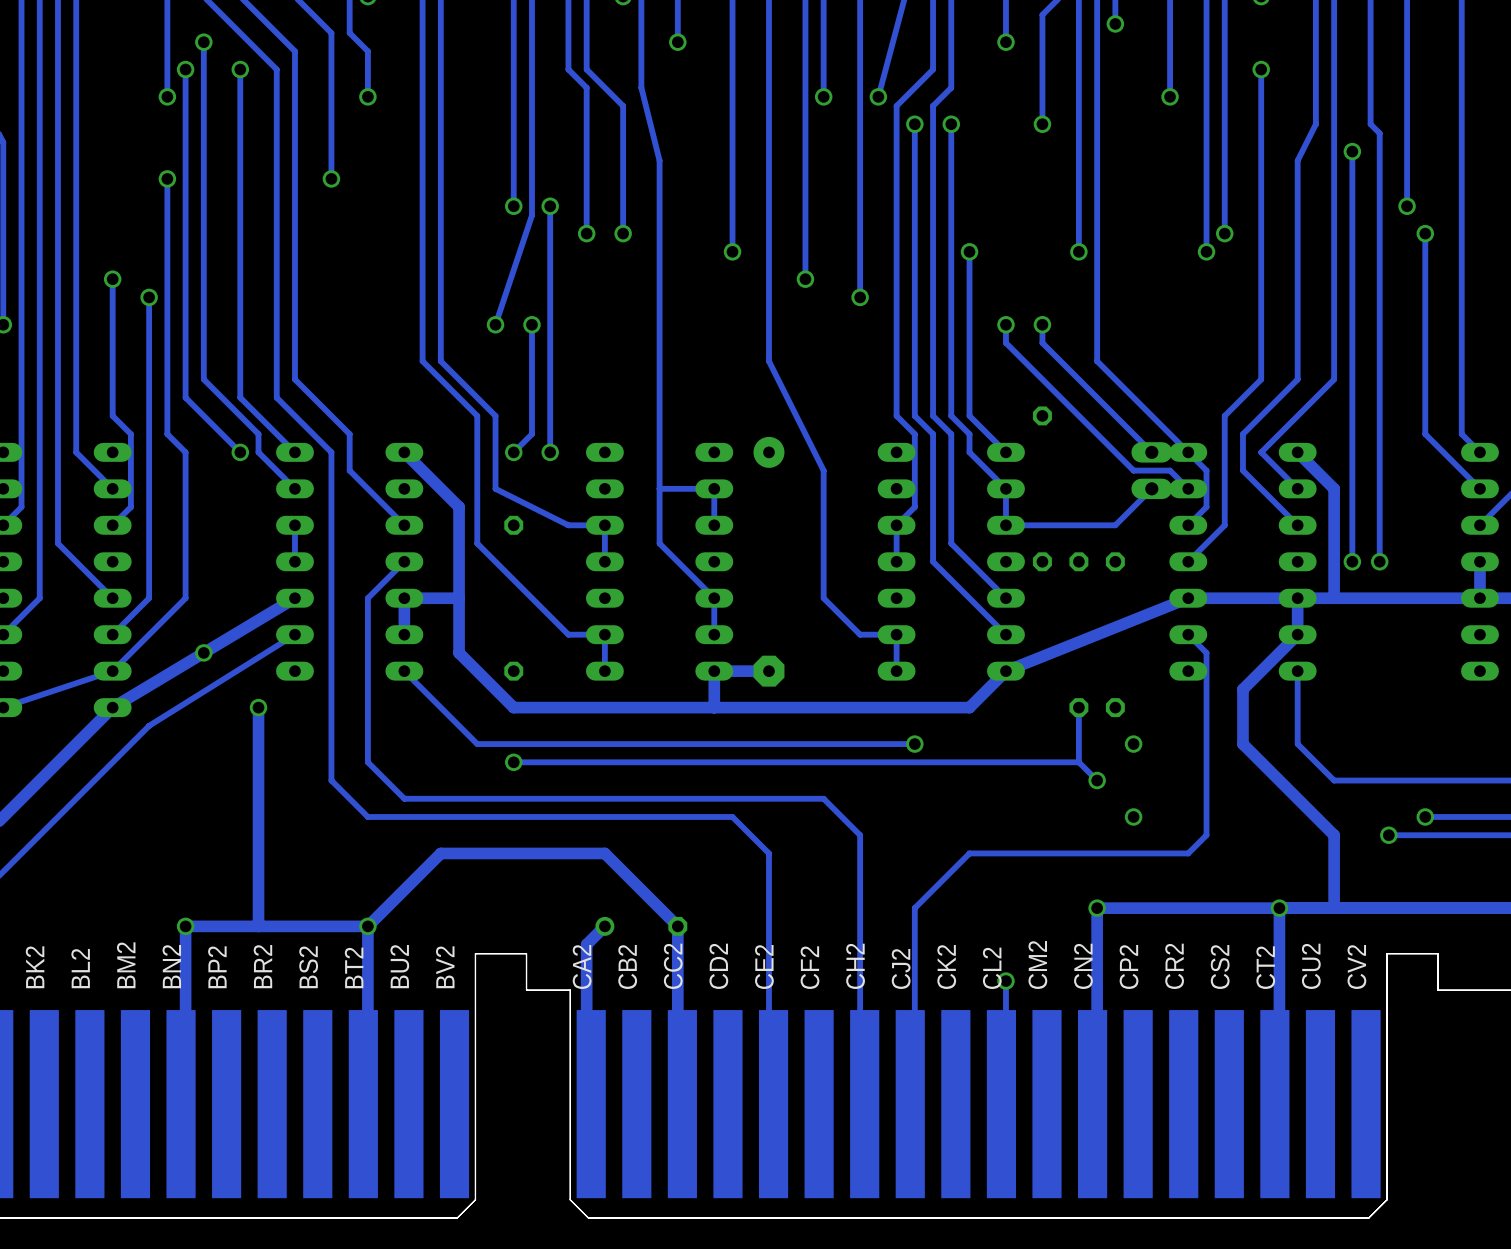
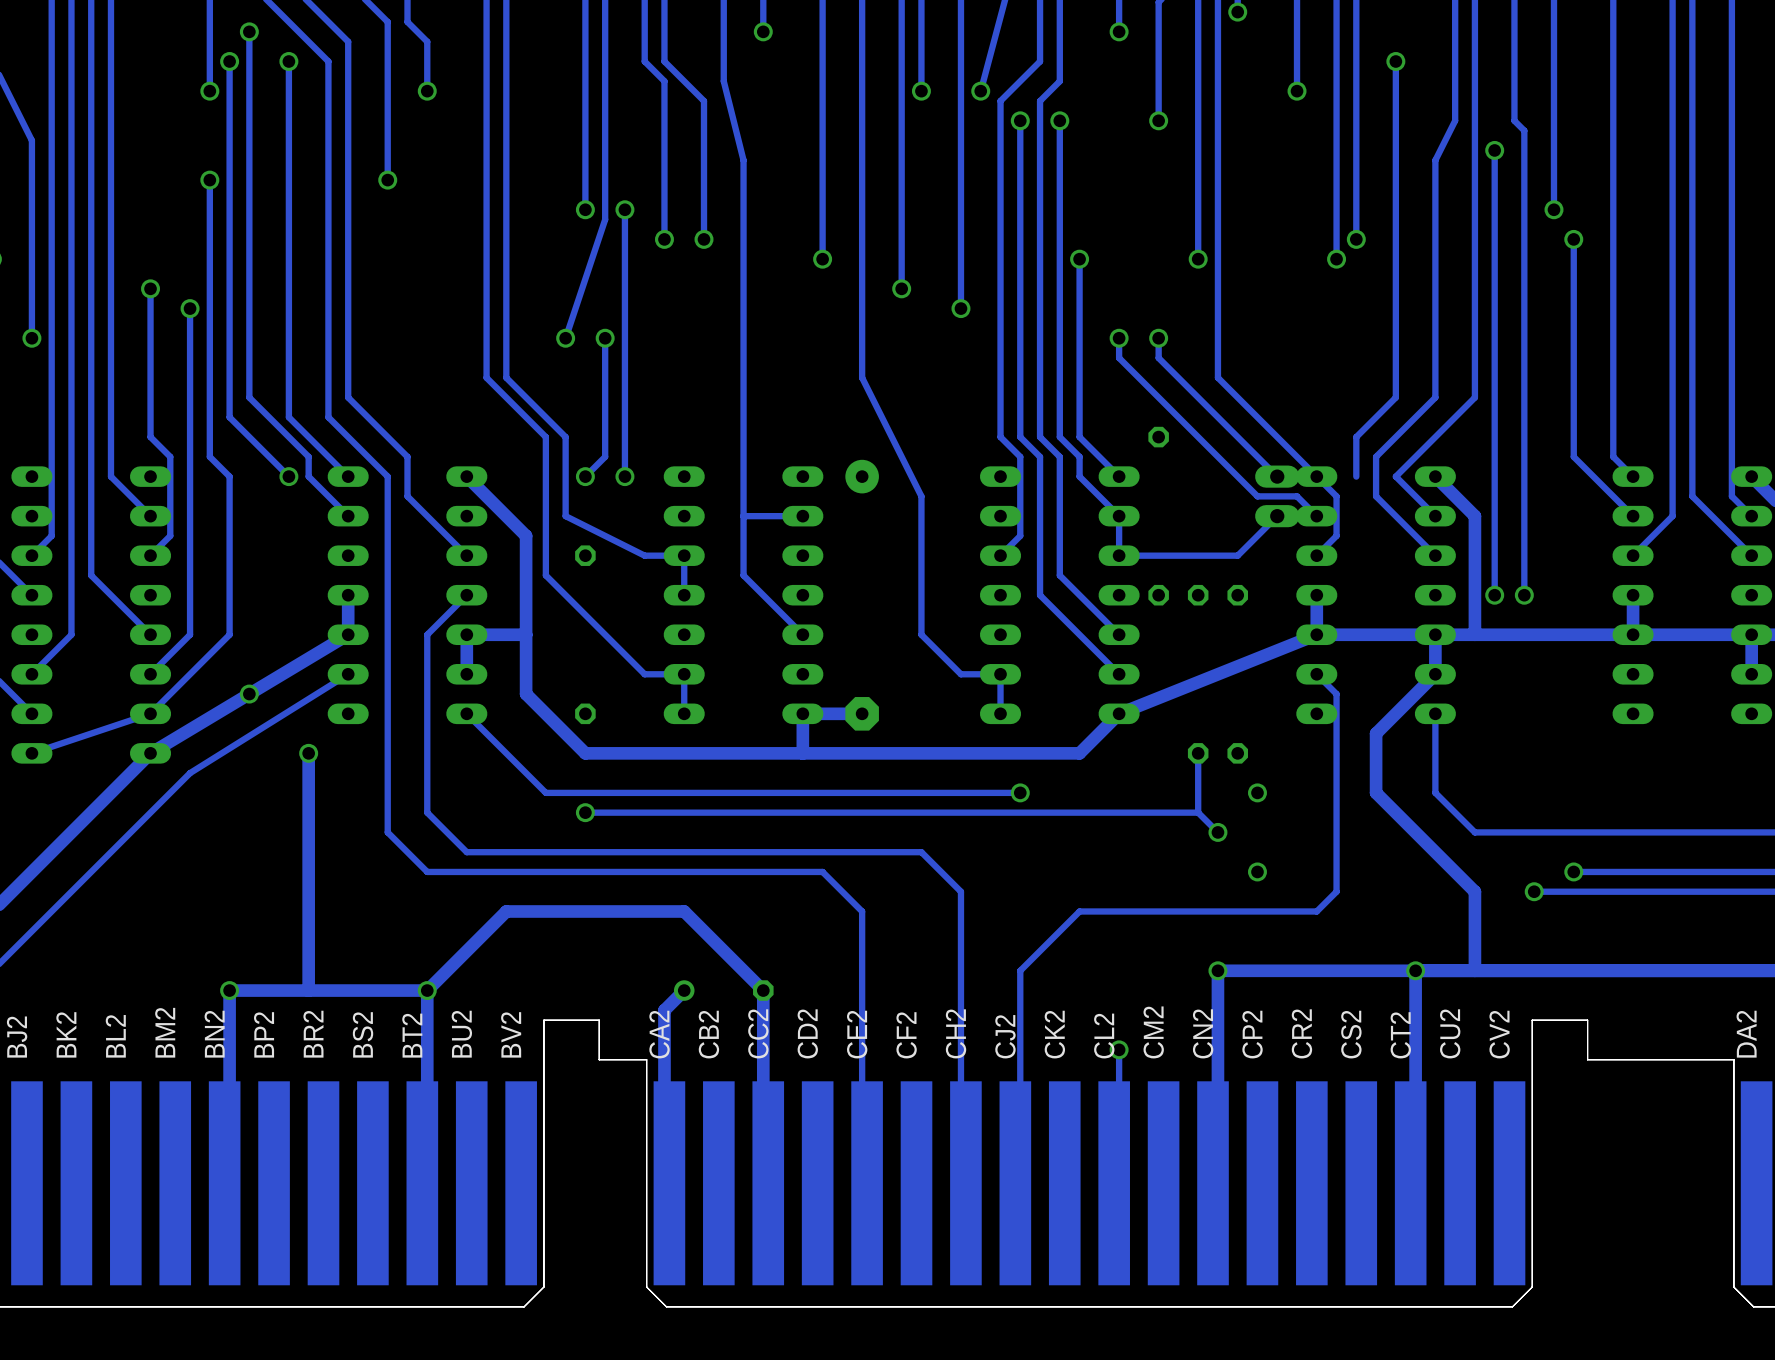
track: (1224, 452) (1224, 525) (1188, 561) -> (1316, 634) (1316, 595)
track: (714, 488) (714, 525) -> none
track: (294, 525) (294, 561) -> (348, 634) (348, 595)
track: (896, 525) (896, 561) -> none
track: (714, 598) (714, 634) -> none

